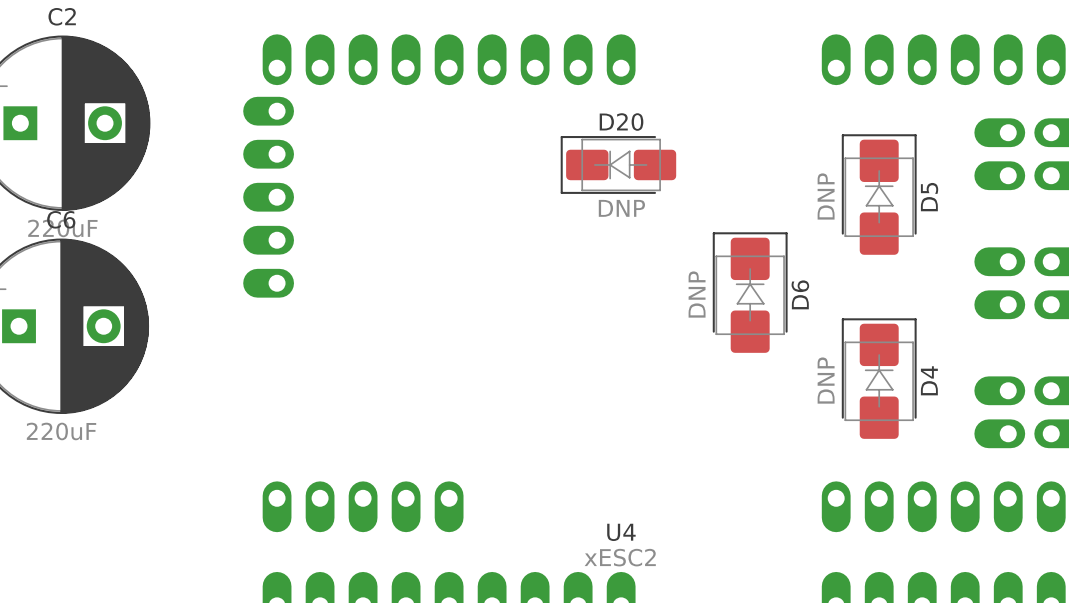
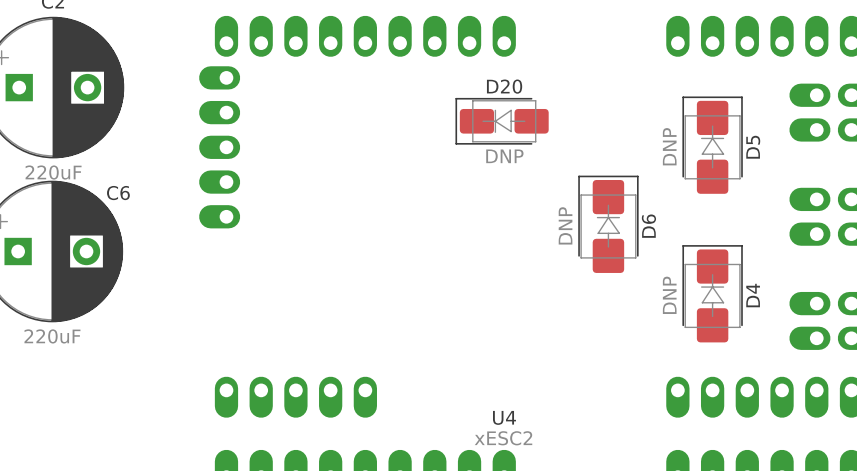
C6 name position: C6 (61, 219) -> C6 (118, 193)

